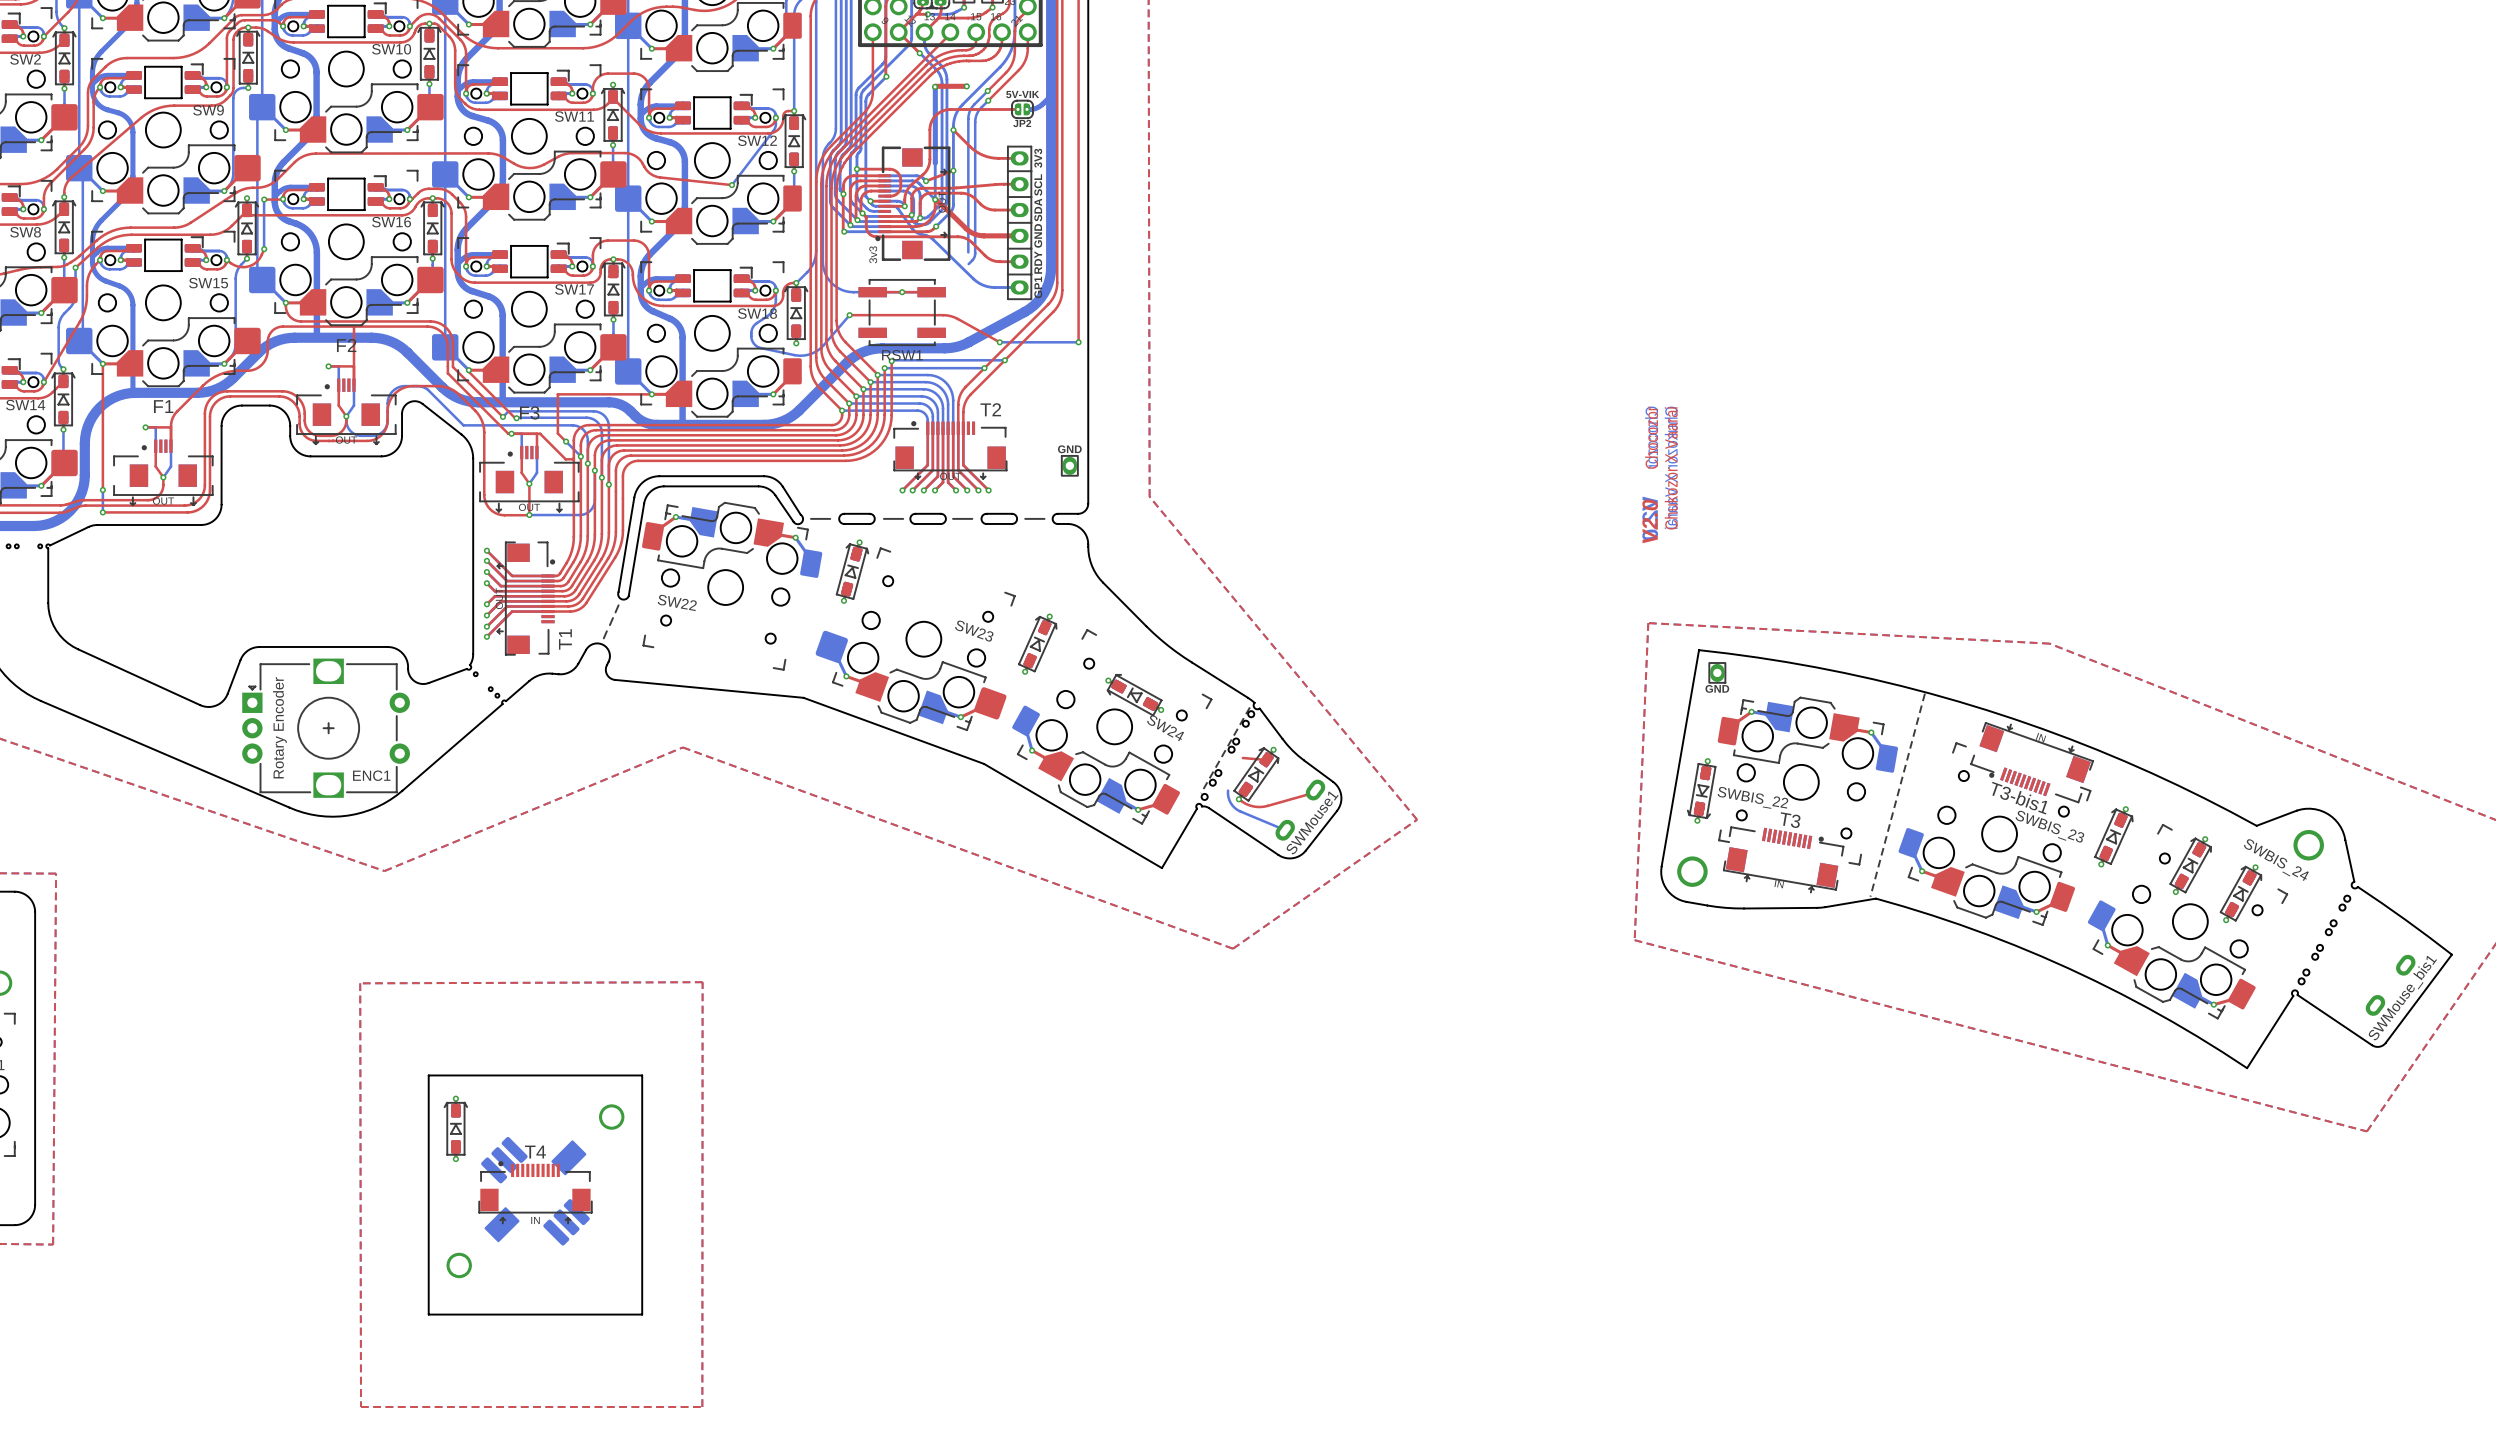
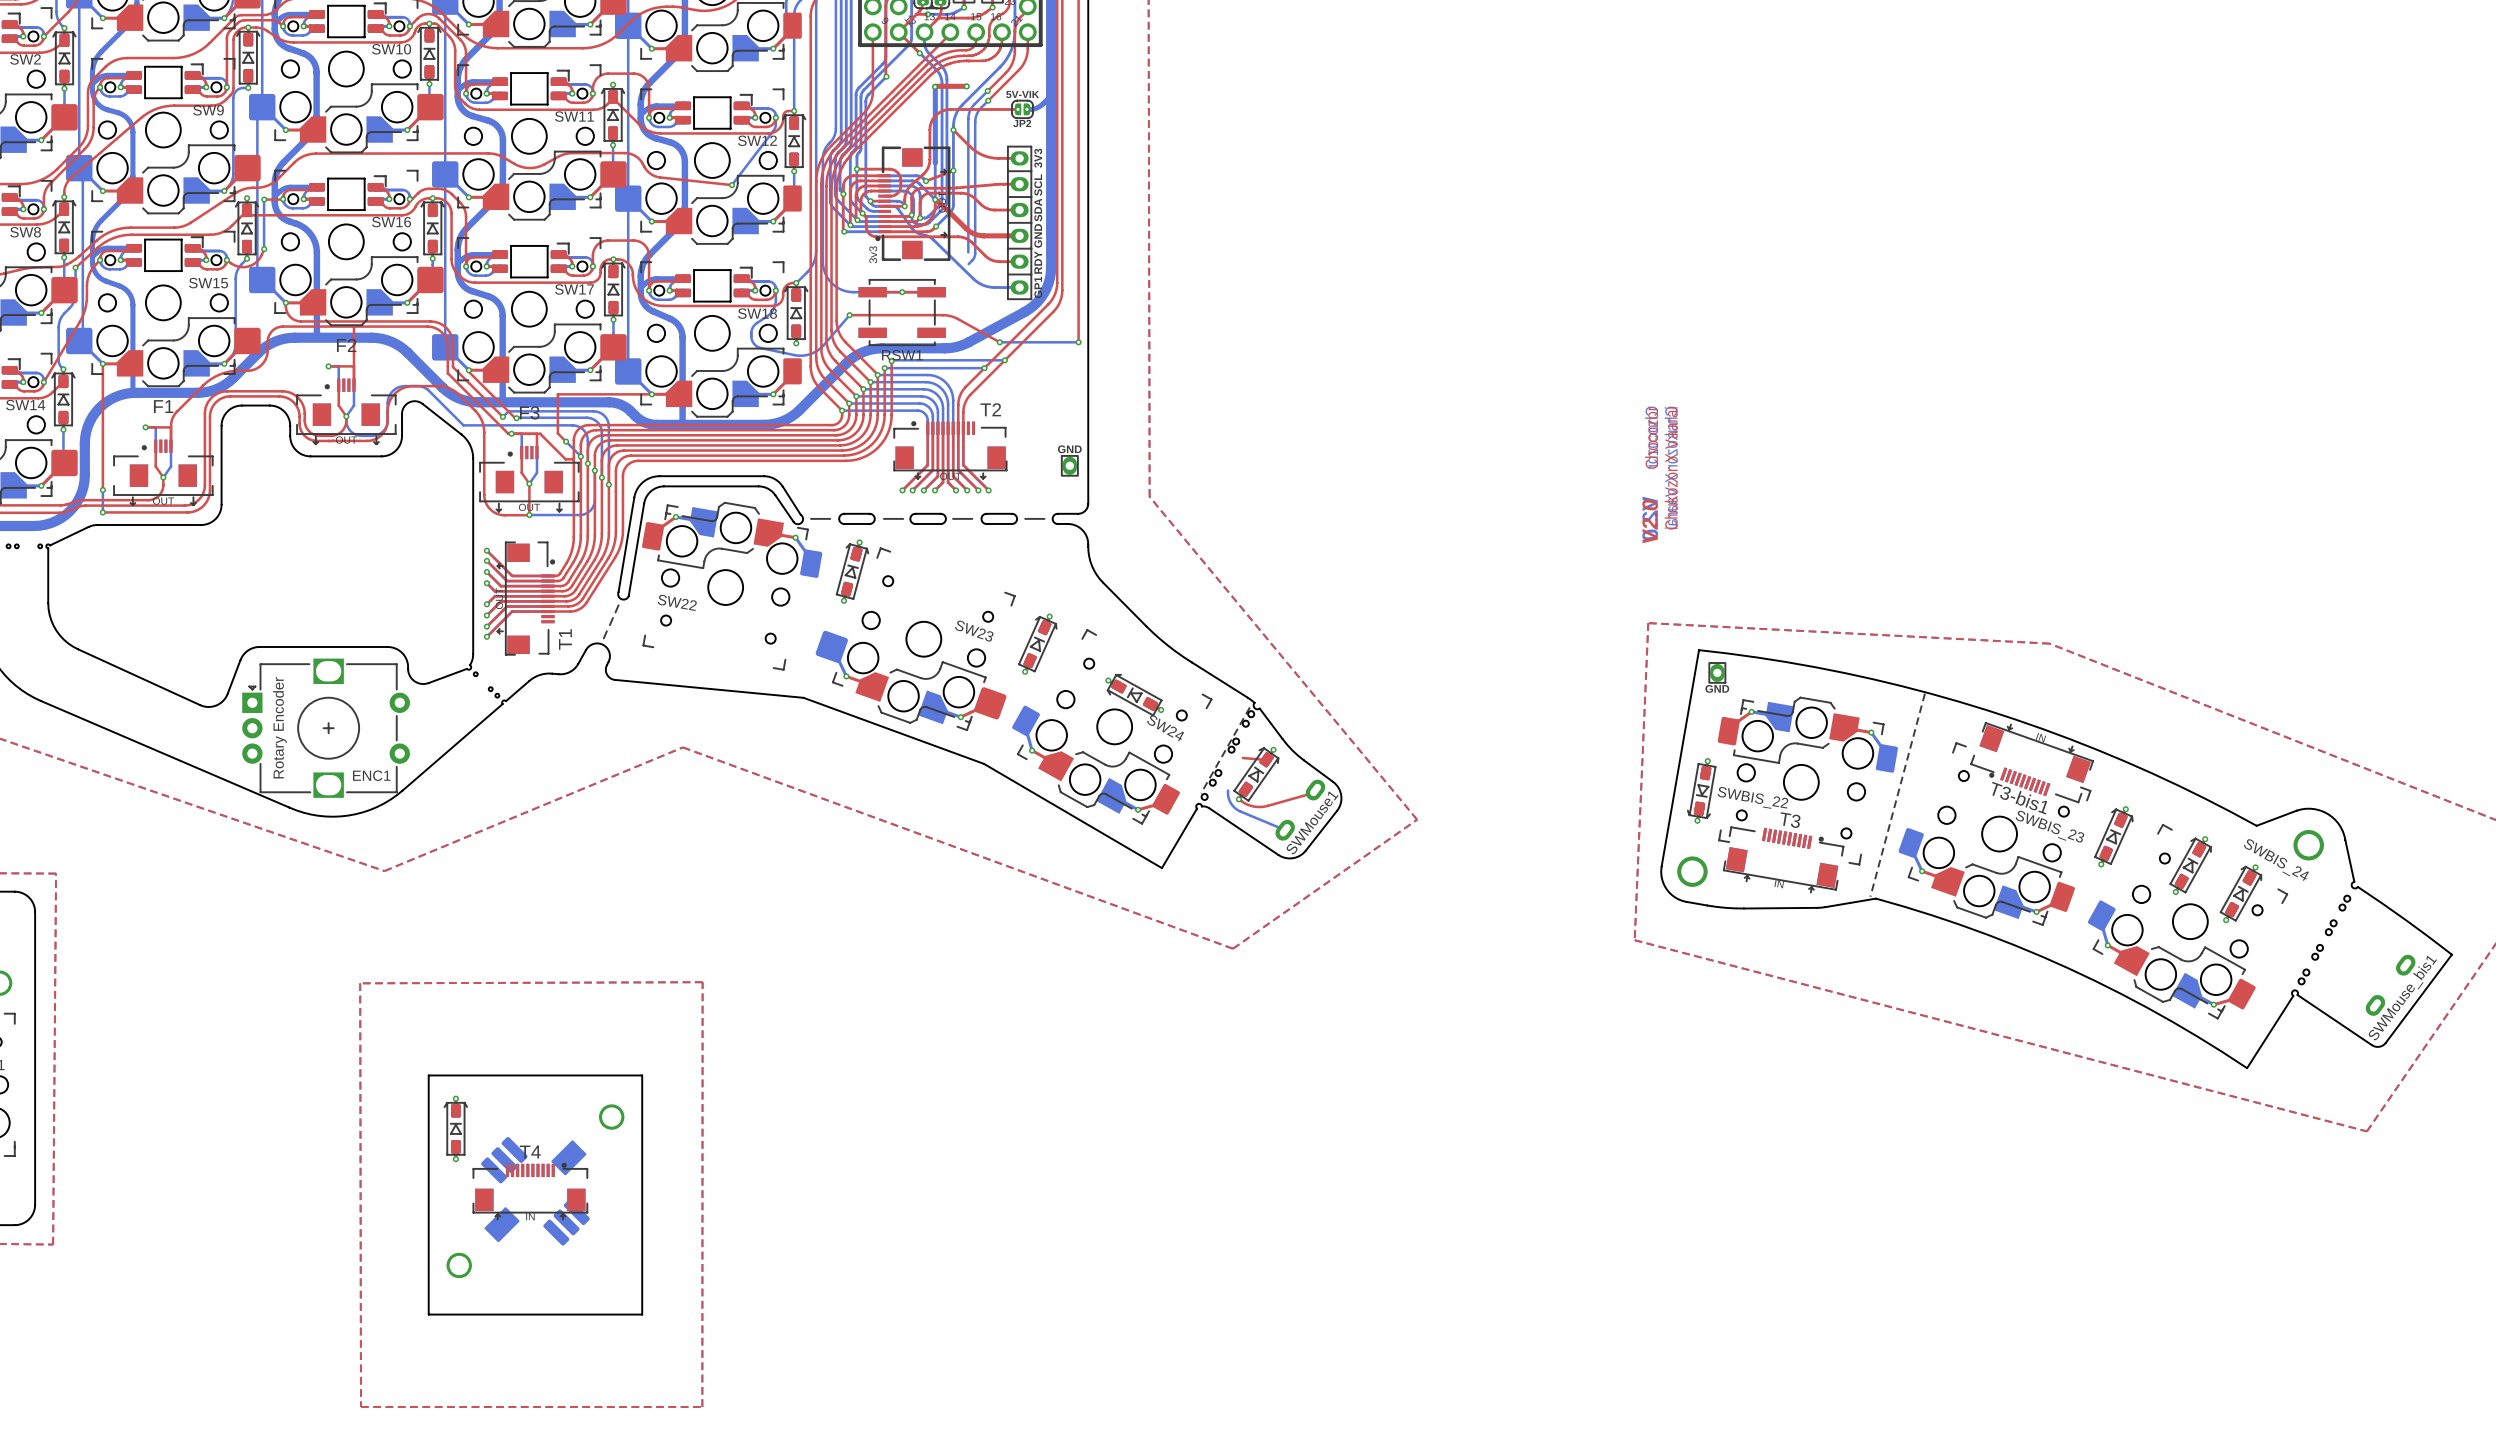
T4 footprint: [478, 1161, 593, 1224] -> [472, 1162, 588, 1221]

